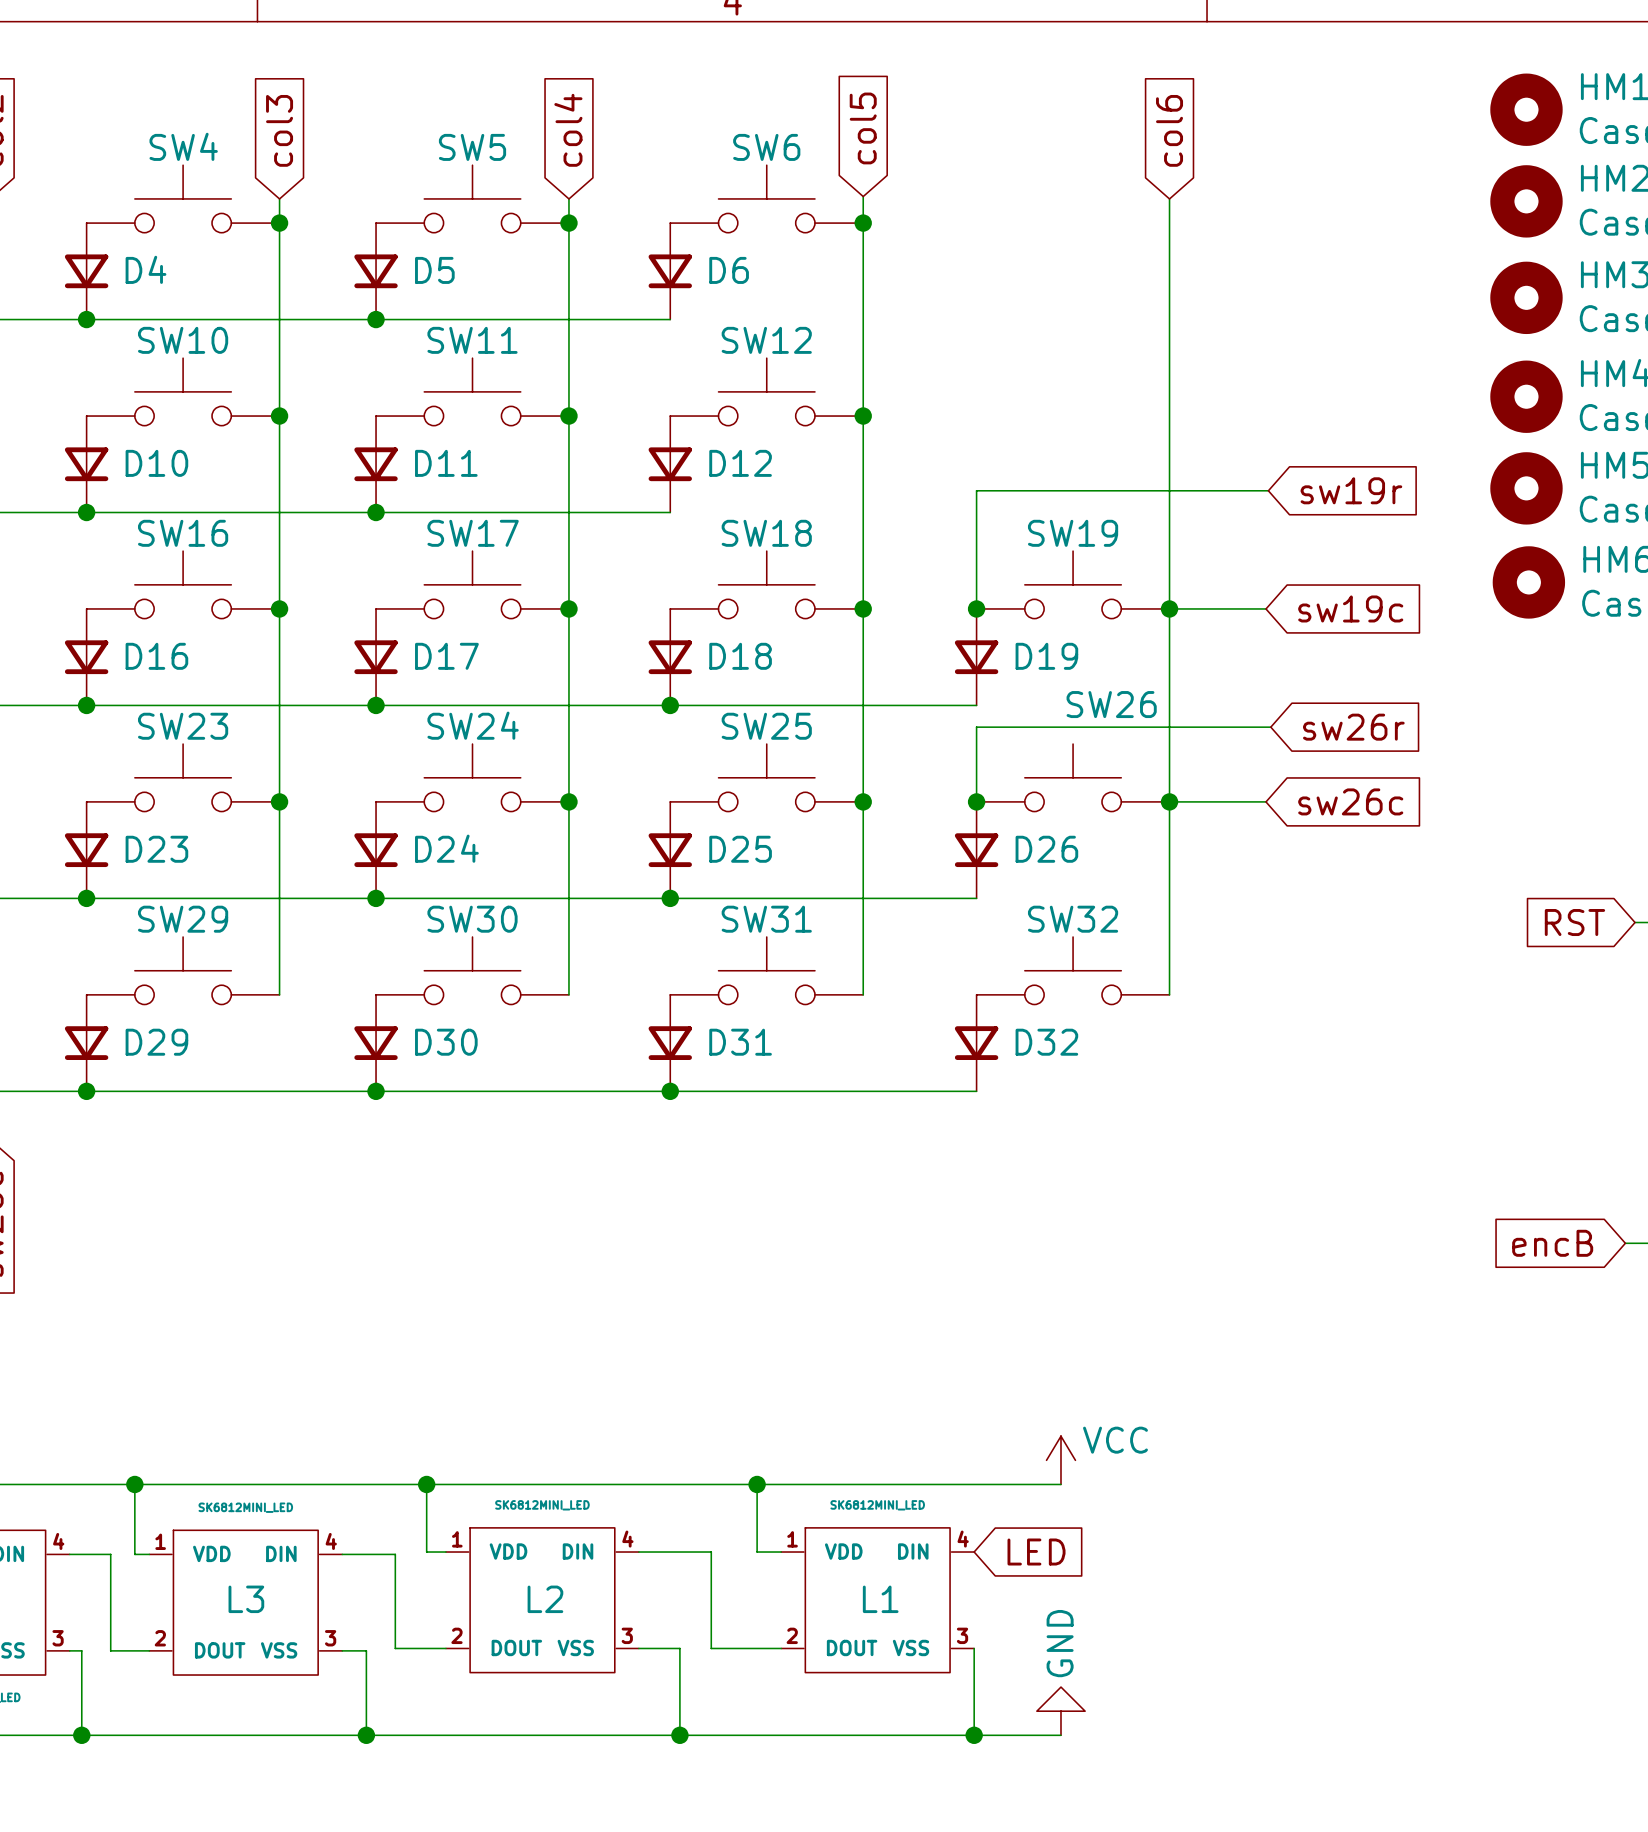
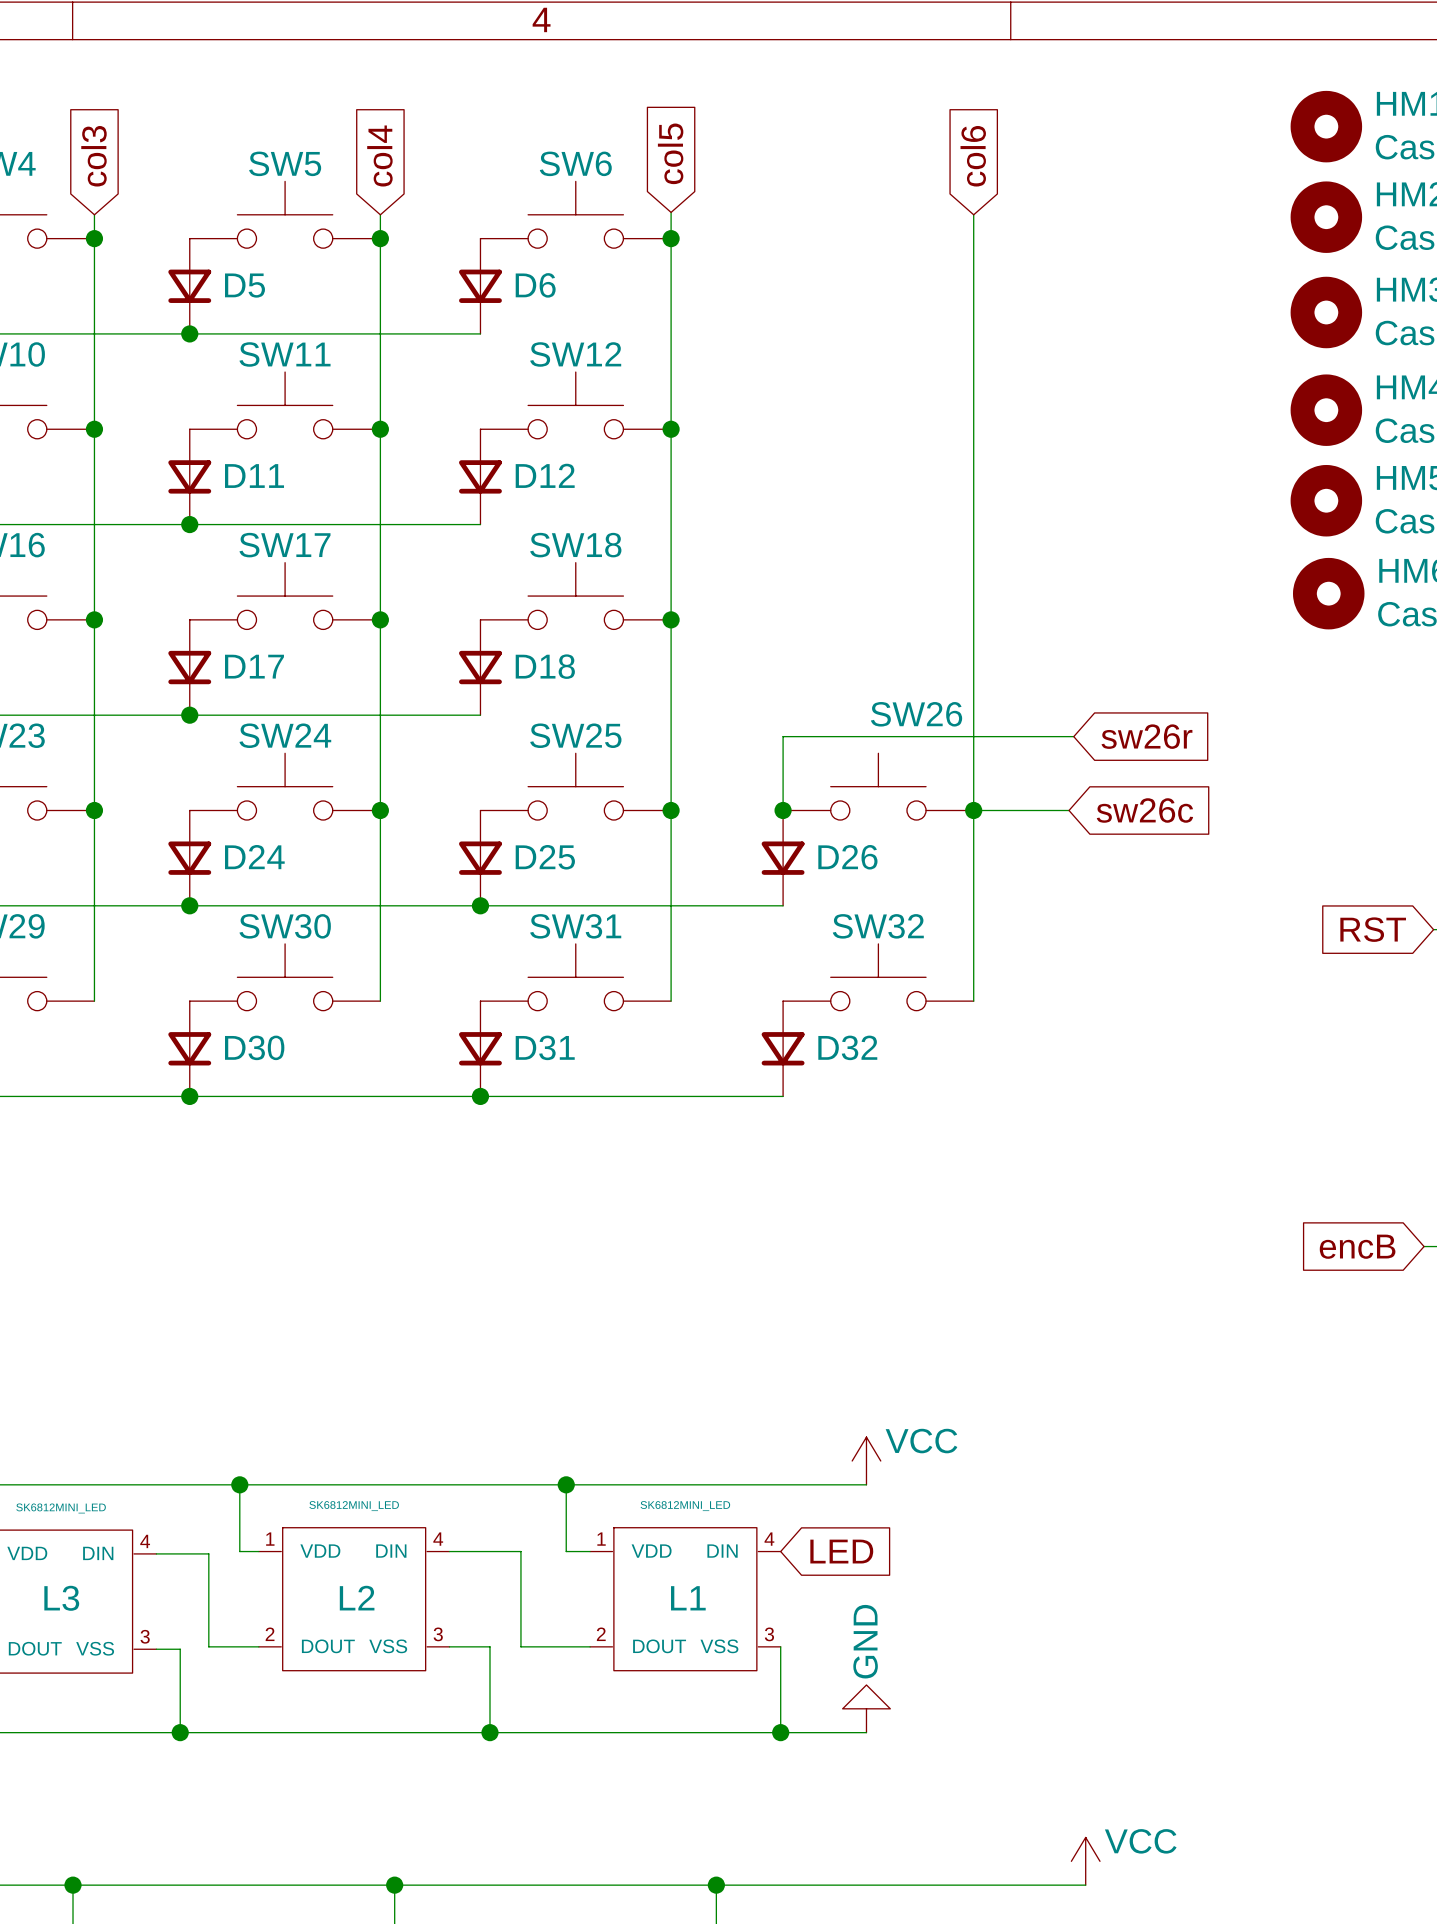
wire: (1268, 490) (976, 490) (976, 608) -> none
global label: sw19r (1351, 490) -> none
SW19: (1073, 584) -> none
junction: (976, 608) -> none
wire: (1169, 608) (1266, 608) -> none
junction: (1169, 608) -> none
global label: sw19c (1350, 608) -> none
D19: (976, 657) -> none
wire: (670, 705) (976, 705) -> none
junction: (670, 705) -> none

